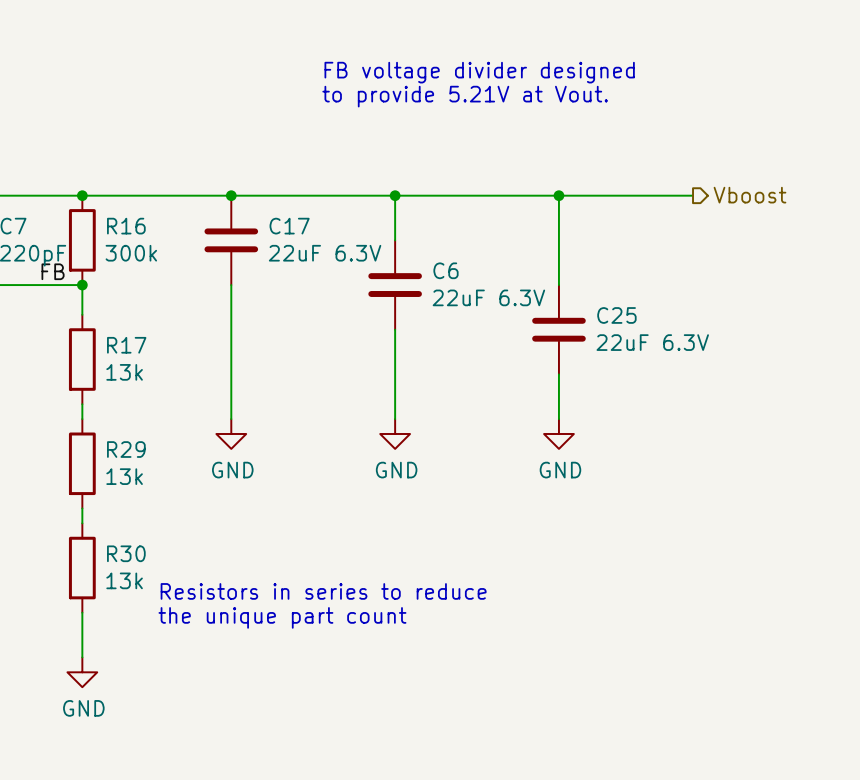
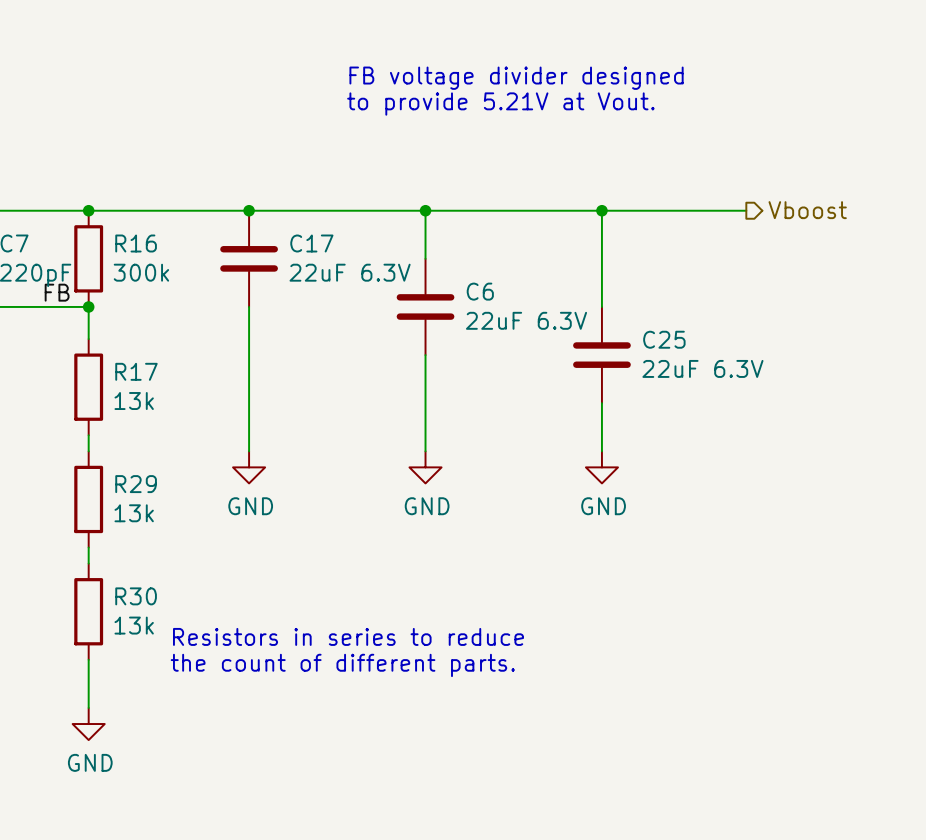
text: the unique part count (282, 617) -> the count of different parts. (342, 665)

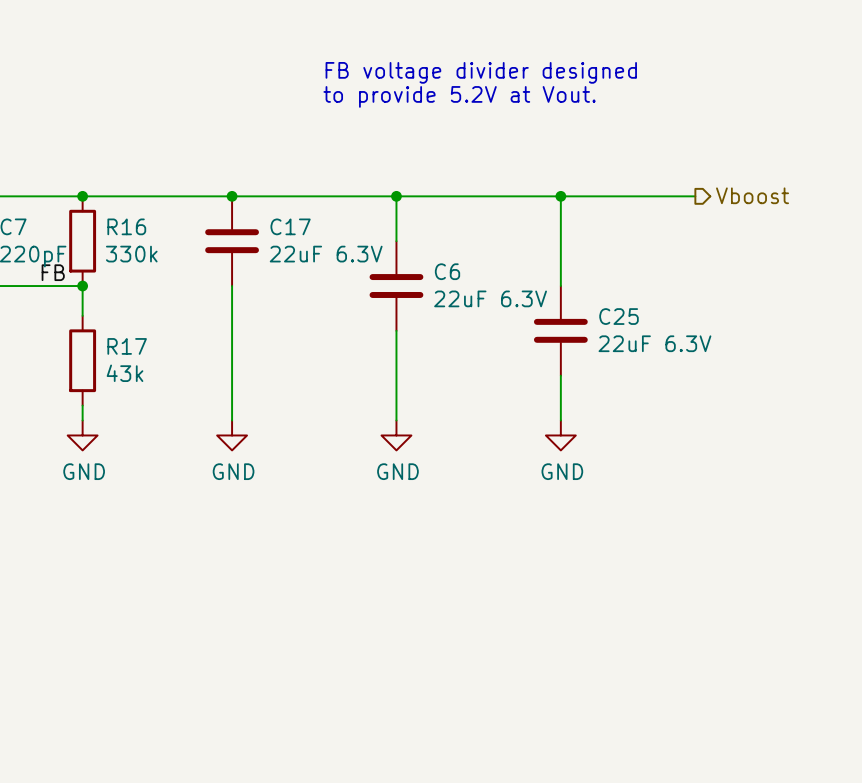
text: to provide 5.21V at Vout. (500, 104) -> to provide 5.2V at Vout. (459, 96)
R16 value: 300k (141, 272) -> 330k (131, 254)
R17 value: 13k (134, 401) -> 43k (125, 373)
R29: 13k (88, 499) -> none
wire: (88, 547) (88, 563) -> none
R30: 13k (88, 611) -> none
text: Resistors in series to reduce (348, 636) -> none
wire: (88, 659) (88, 707) -> none
text: the count of different parts. (342, 665) -> none
power symbol position: GND (88, 724) -> GND (82, 435)

